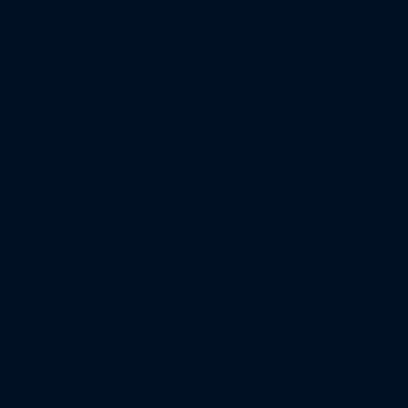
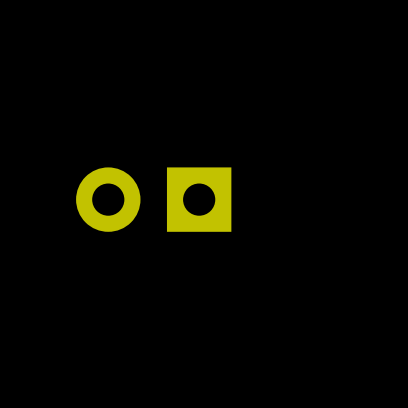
part: none -> (153, 199)

